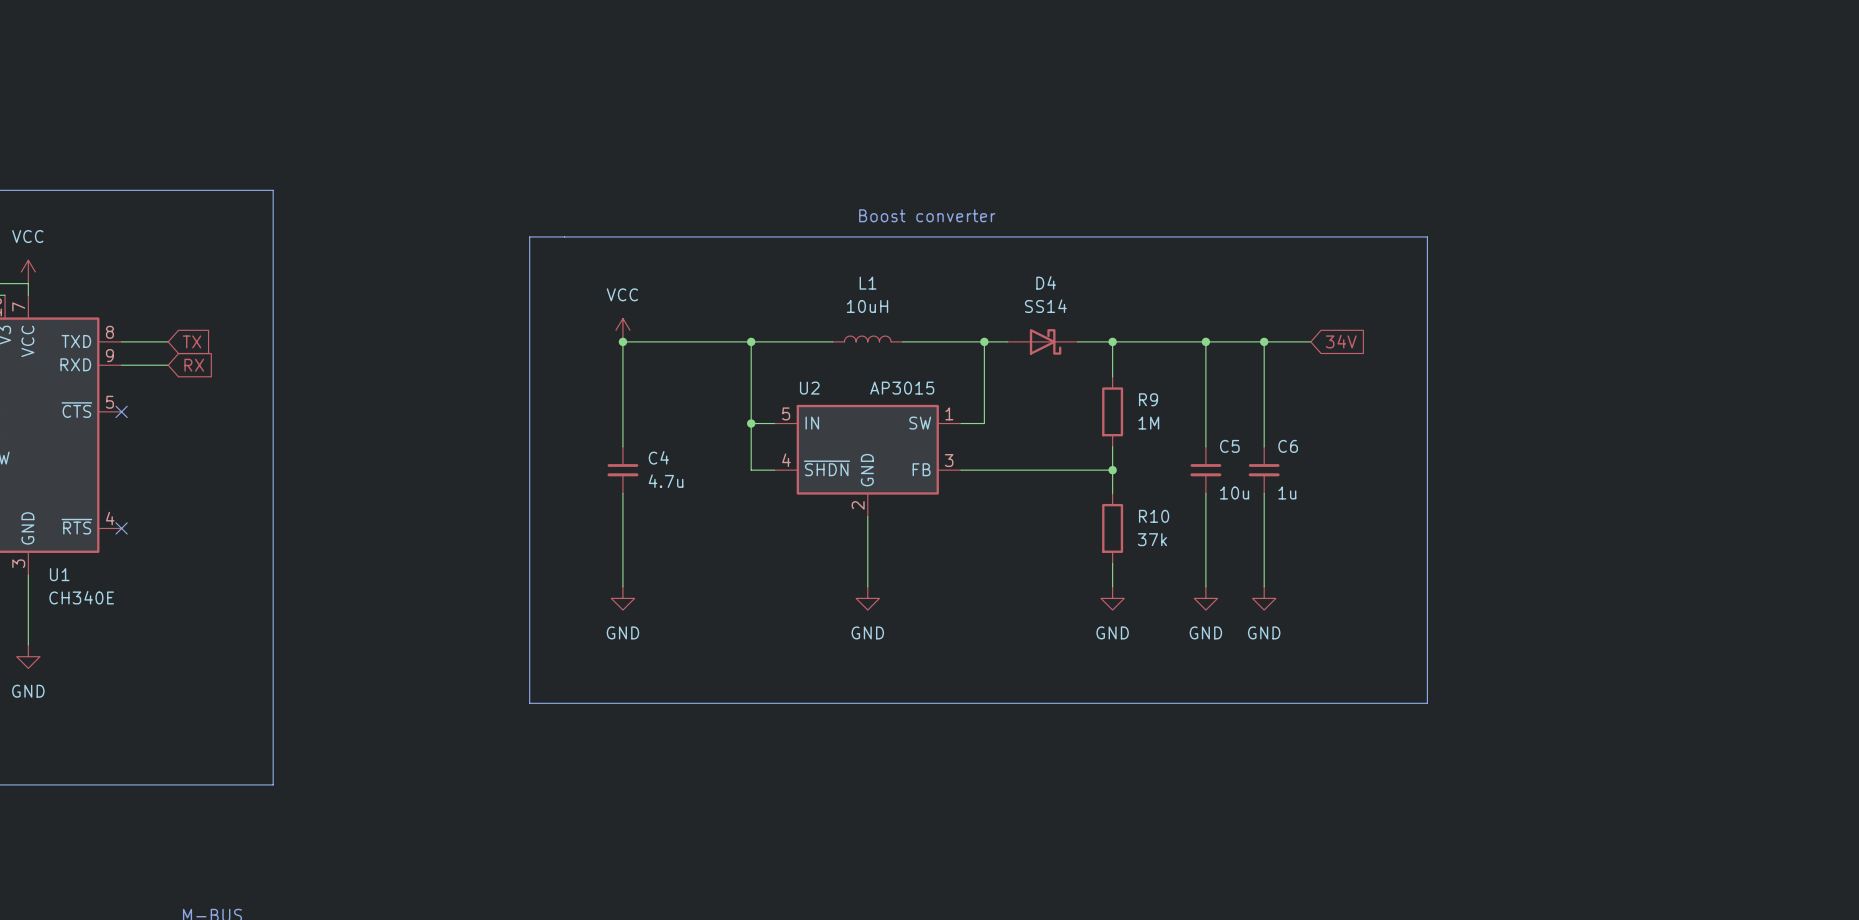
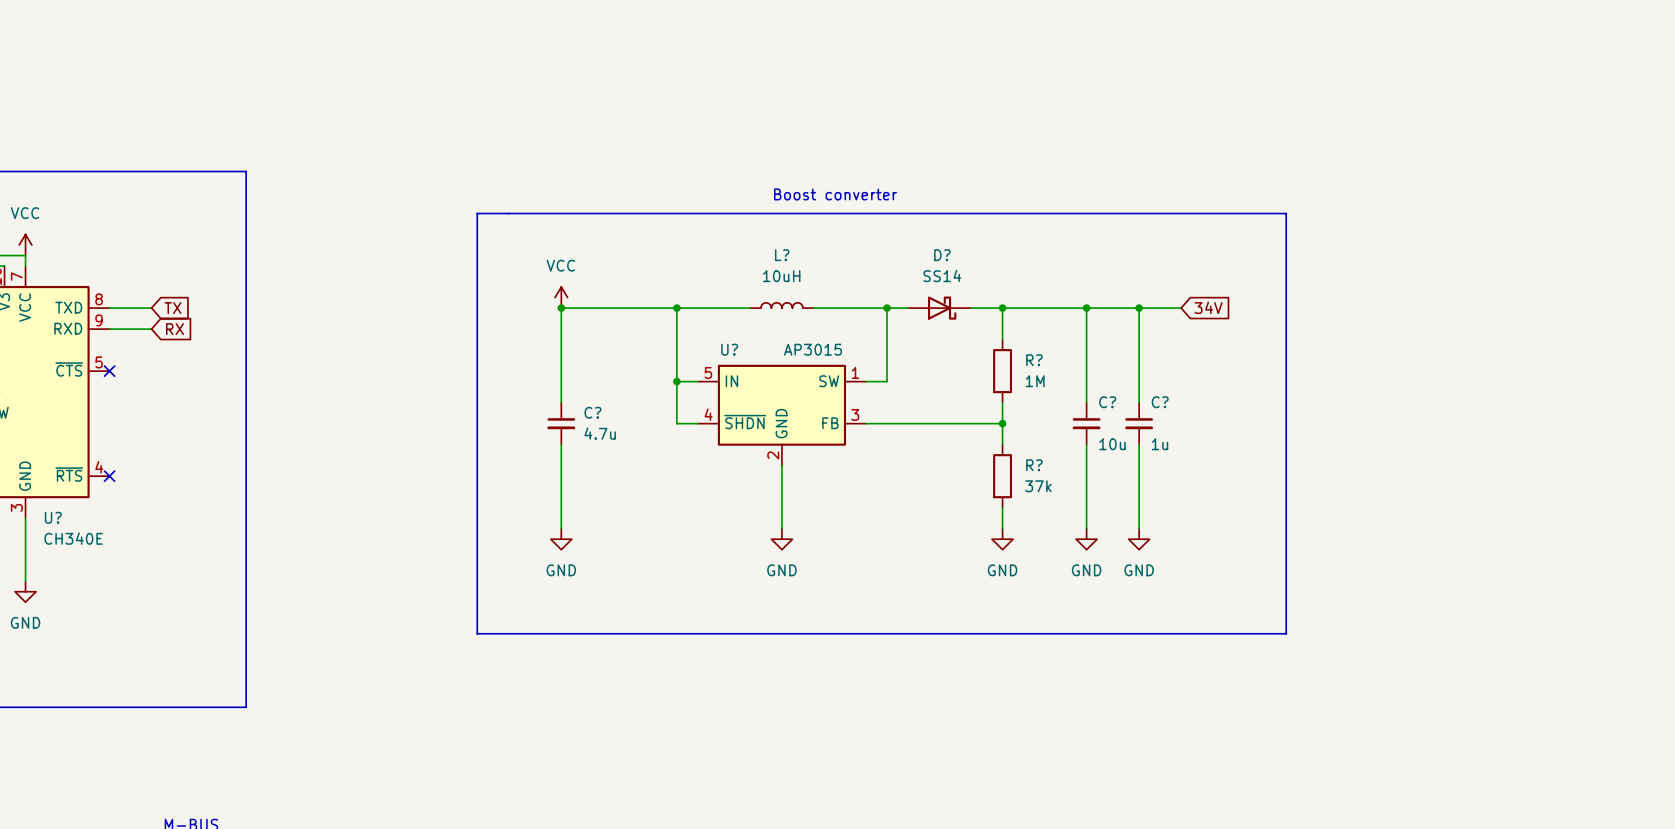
D4 name: D4 (1046, 282) -> D? (942, 255)
L1 name: L1 (868, 283) -> L? (782, 255)
U2 name: U2 (809, 388) -> U? (729, 349)
R9 name: R9 (1148, 399) -> R? (1034, 360)
C5 name: C5 (1229, 446) -> C? (1107, 402)
C6 name: C6 (1288, 446) -> C? (1160, 402)
C4 name: C4 (658, 457) -> C? (592, 412)
R10 name: R10 (1154, 516) -> R? (1034, 465)
U1 name: U1 (59, 574) -> U? (53, 517)

